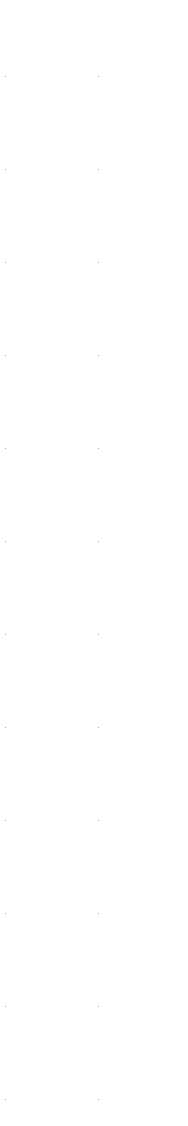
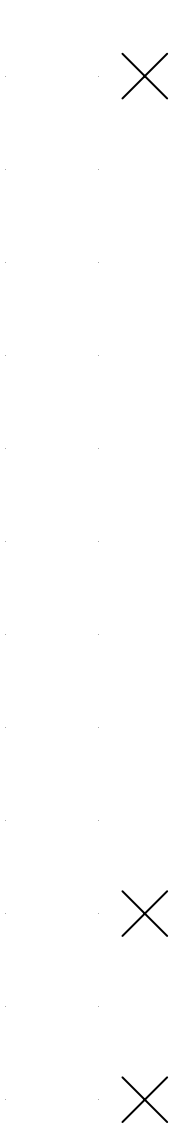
no-connect mark: none -> (144, 76)
no-connect mark: none -> (144, 913)
no-connect mark: none -> (144, 1099)

